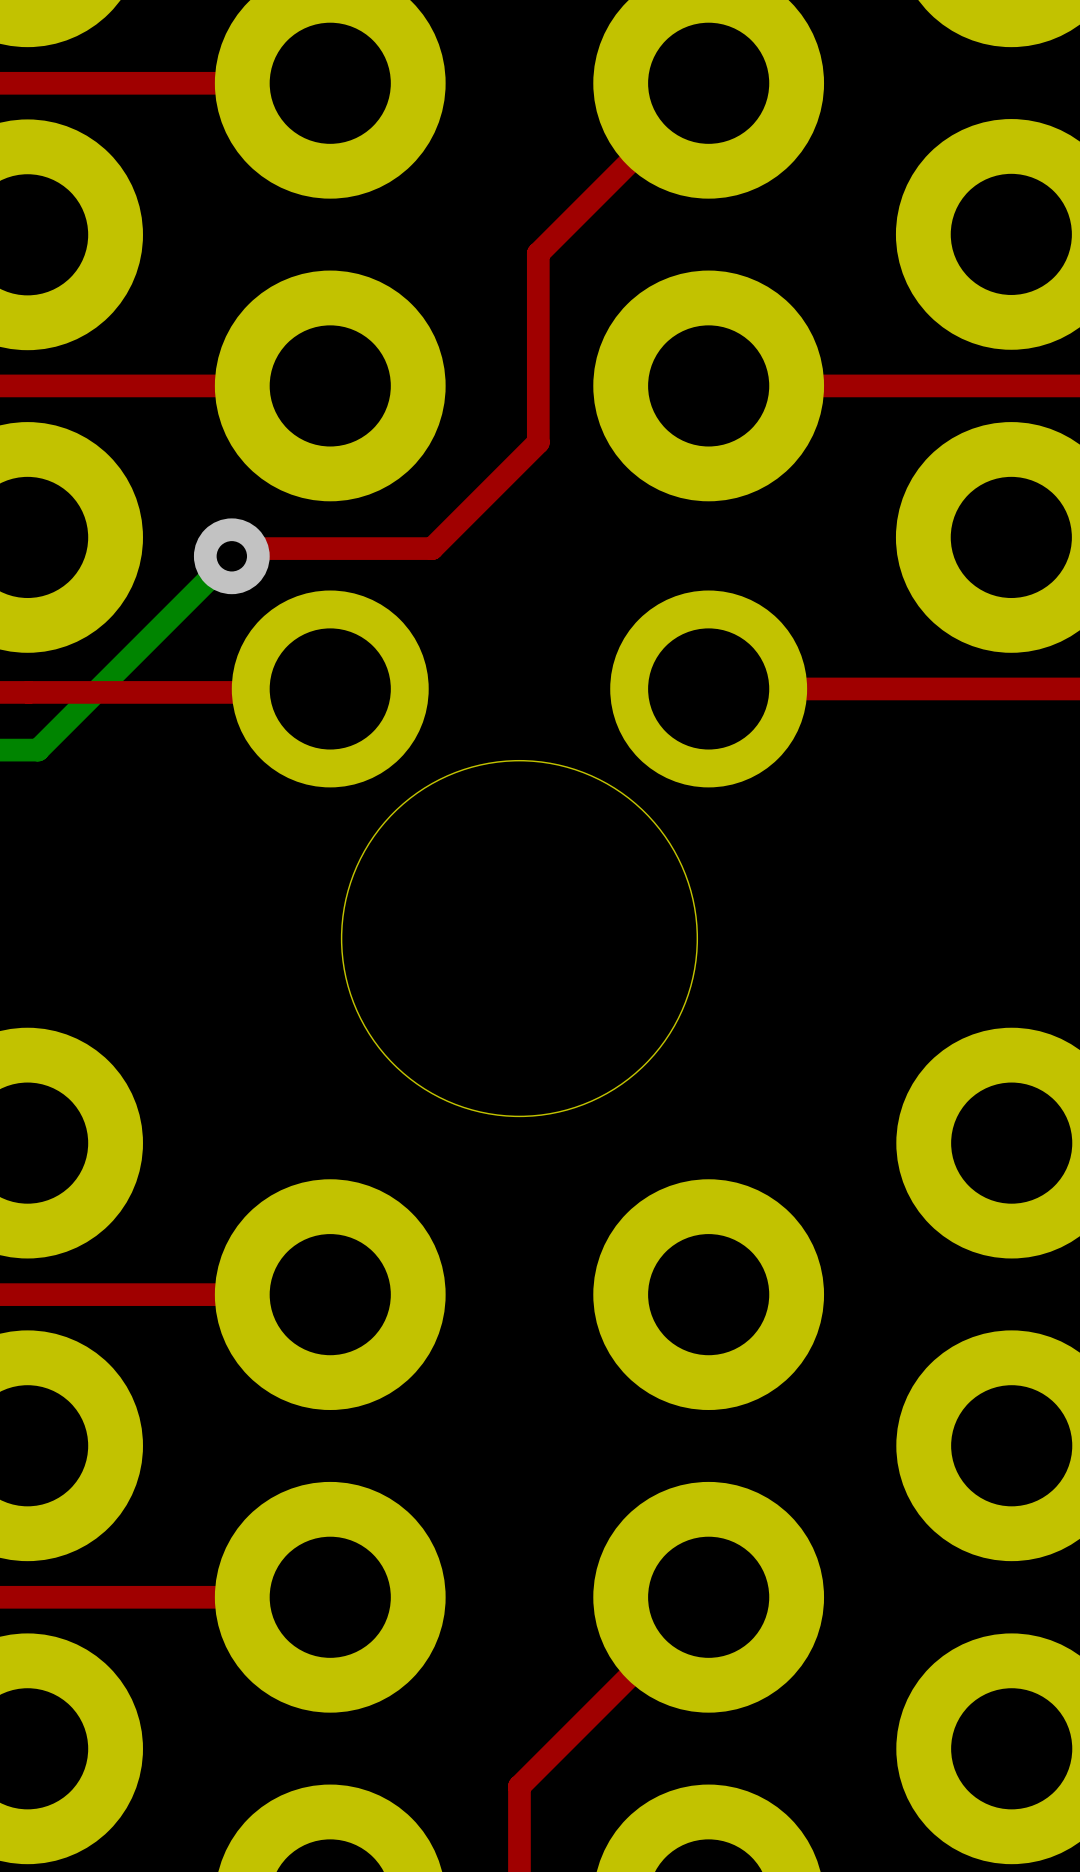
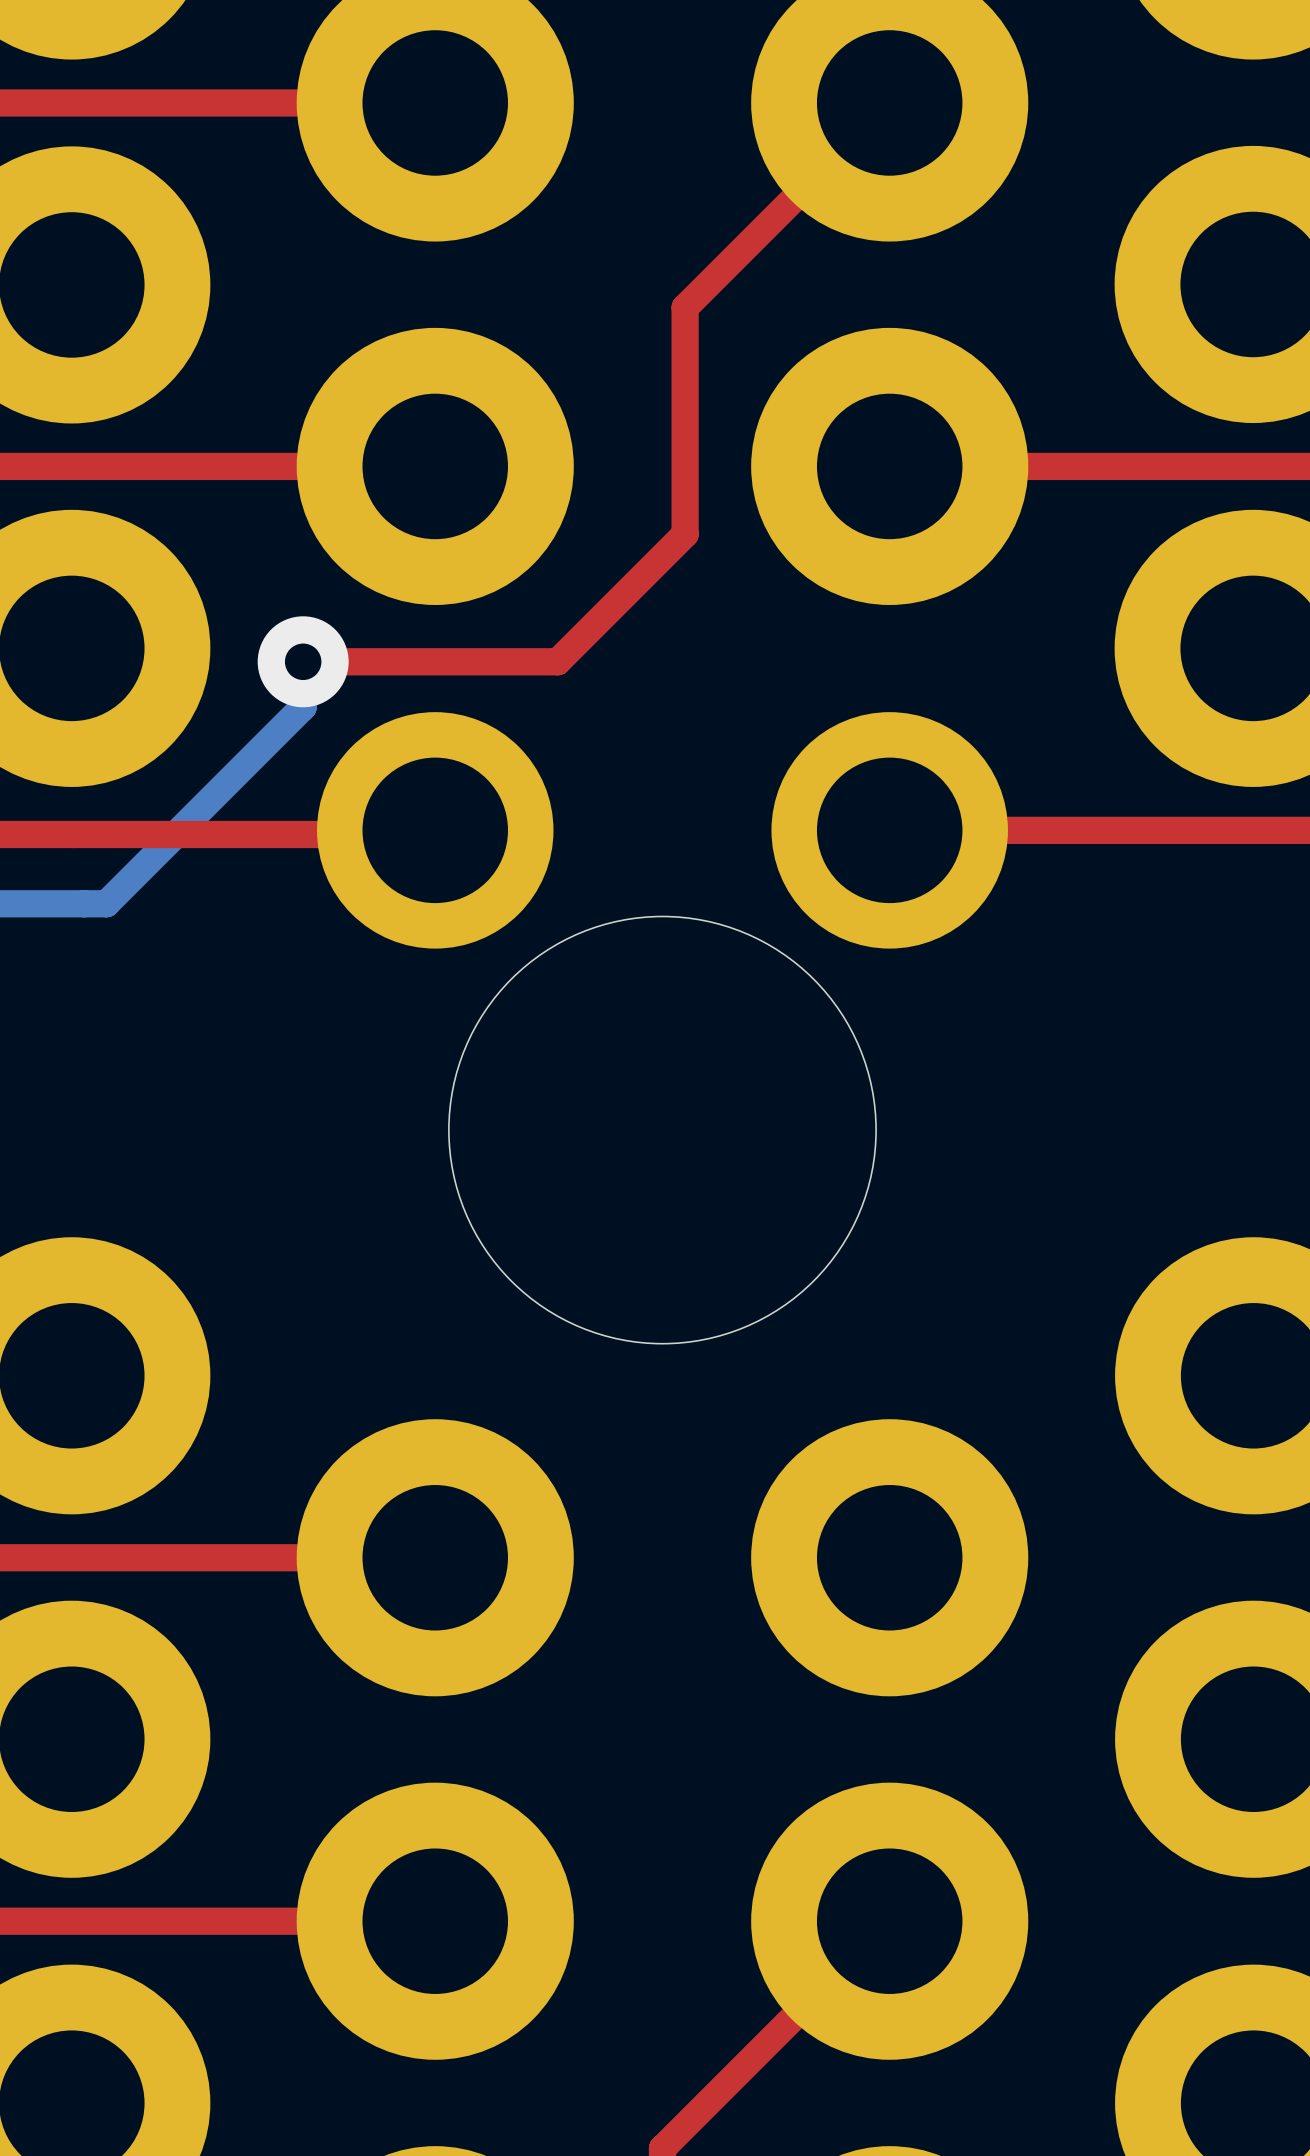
bottom track: (231, 556) (38, 750) -> (303, 661) (303, 707) (106, 903) (84, 903)
via position: (231, 556) -> (303, 661)

